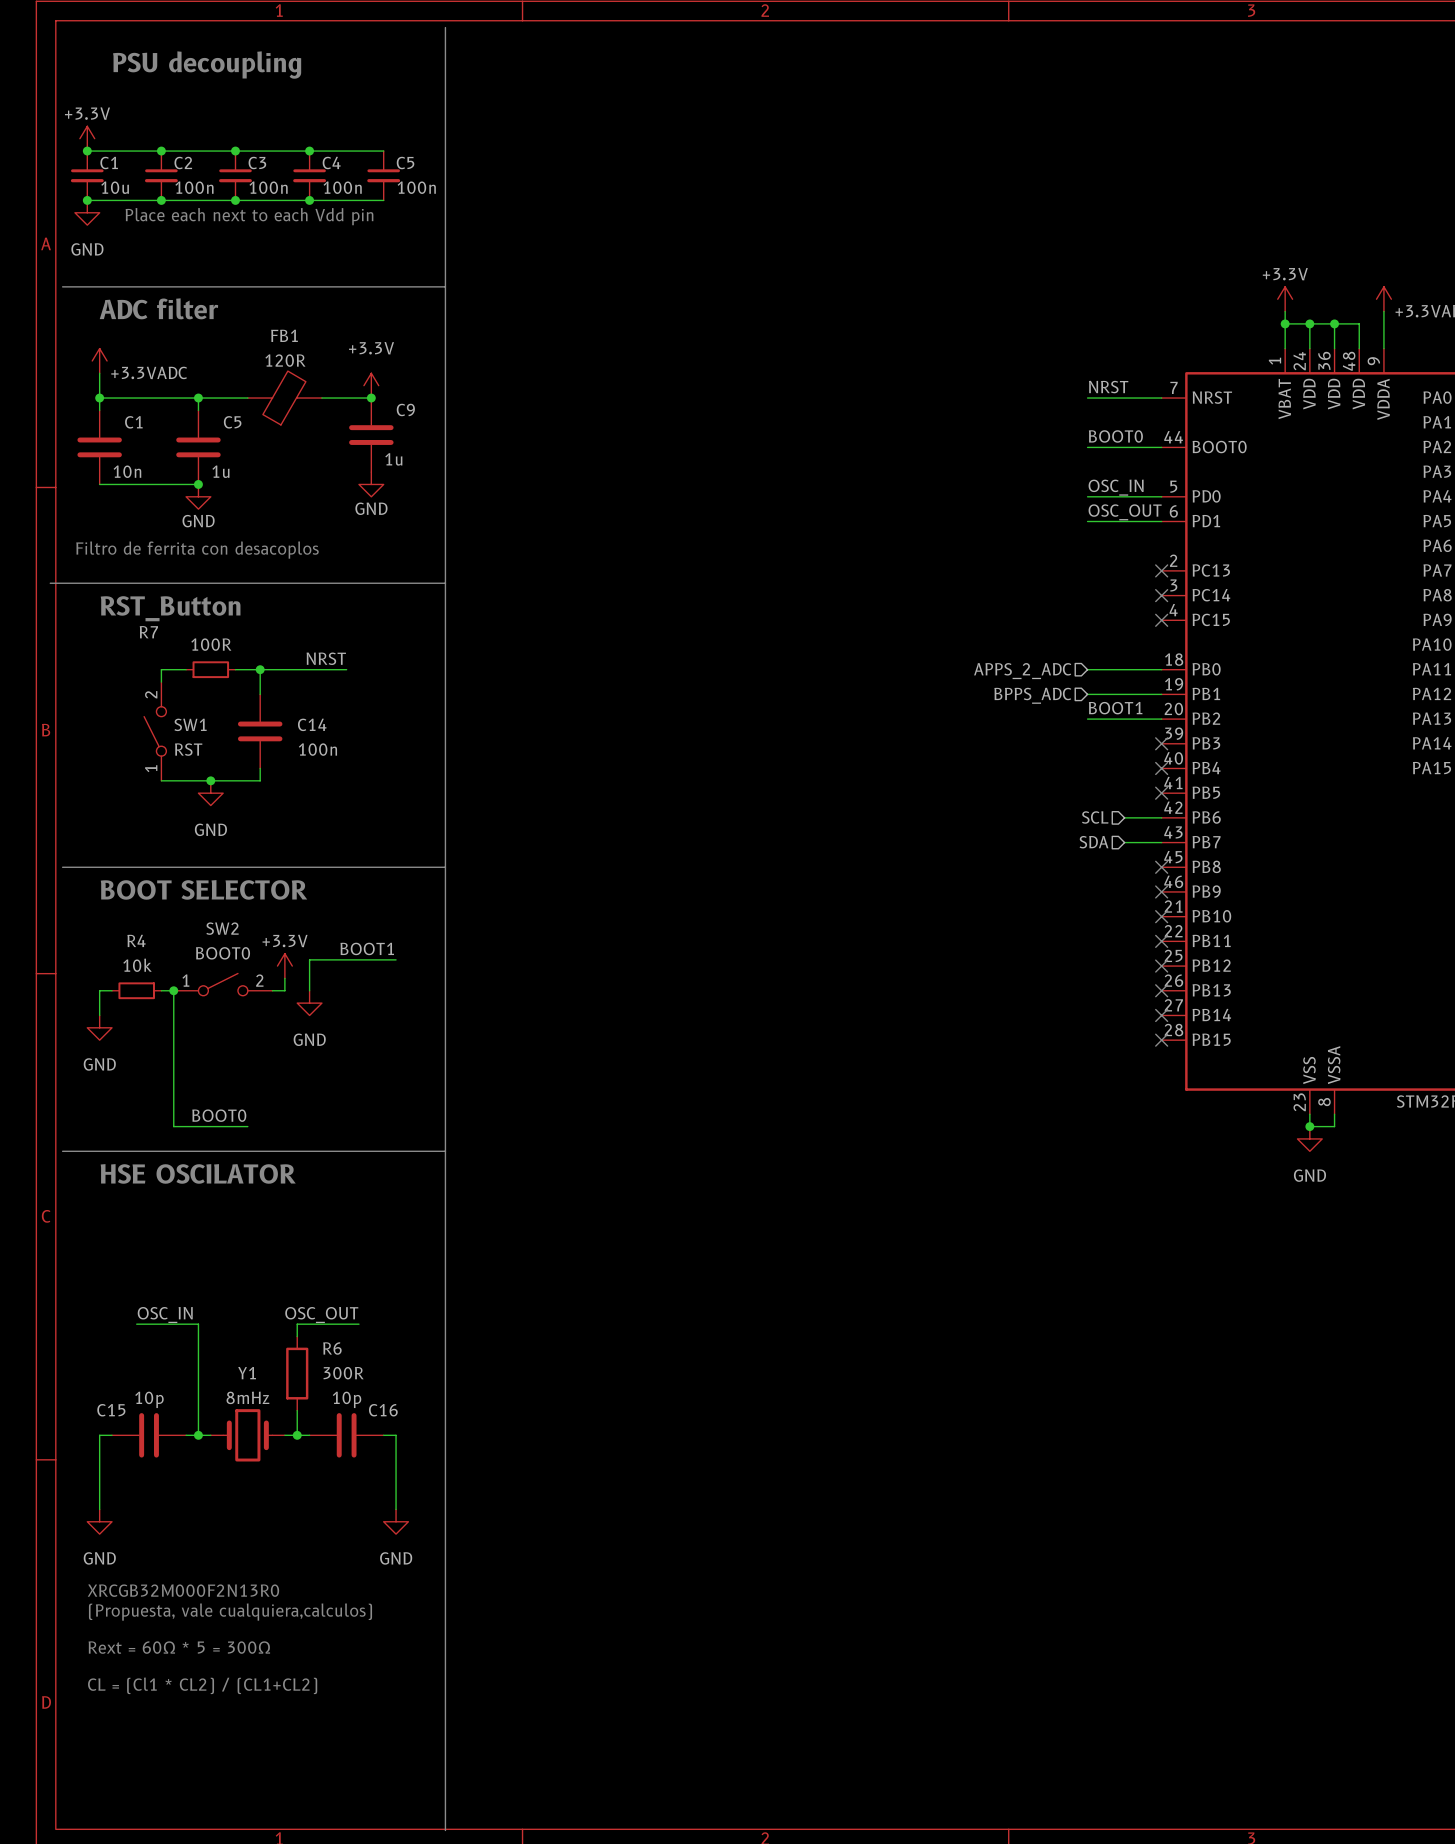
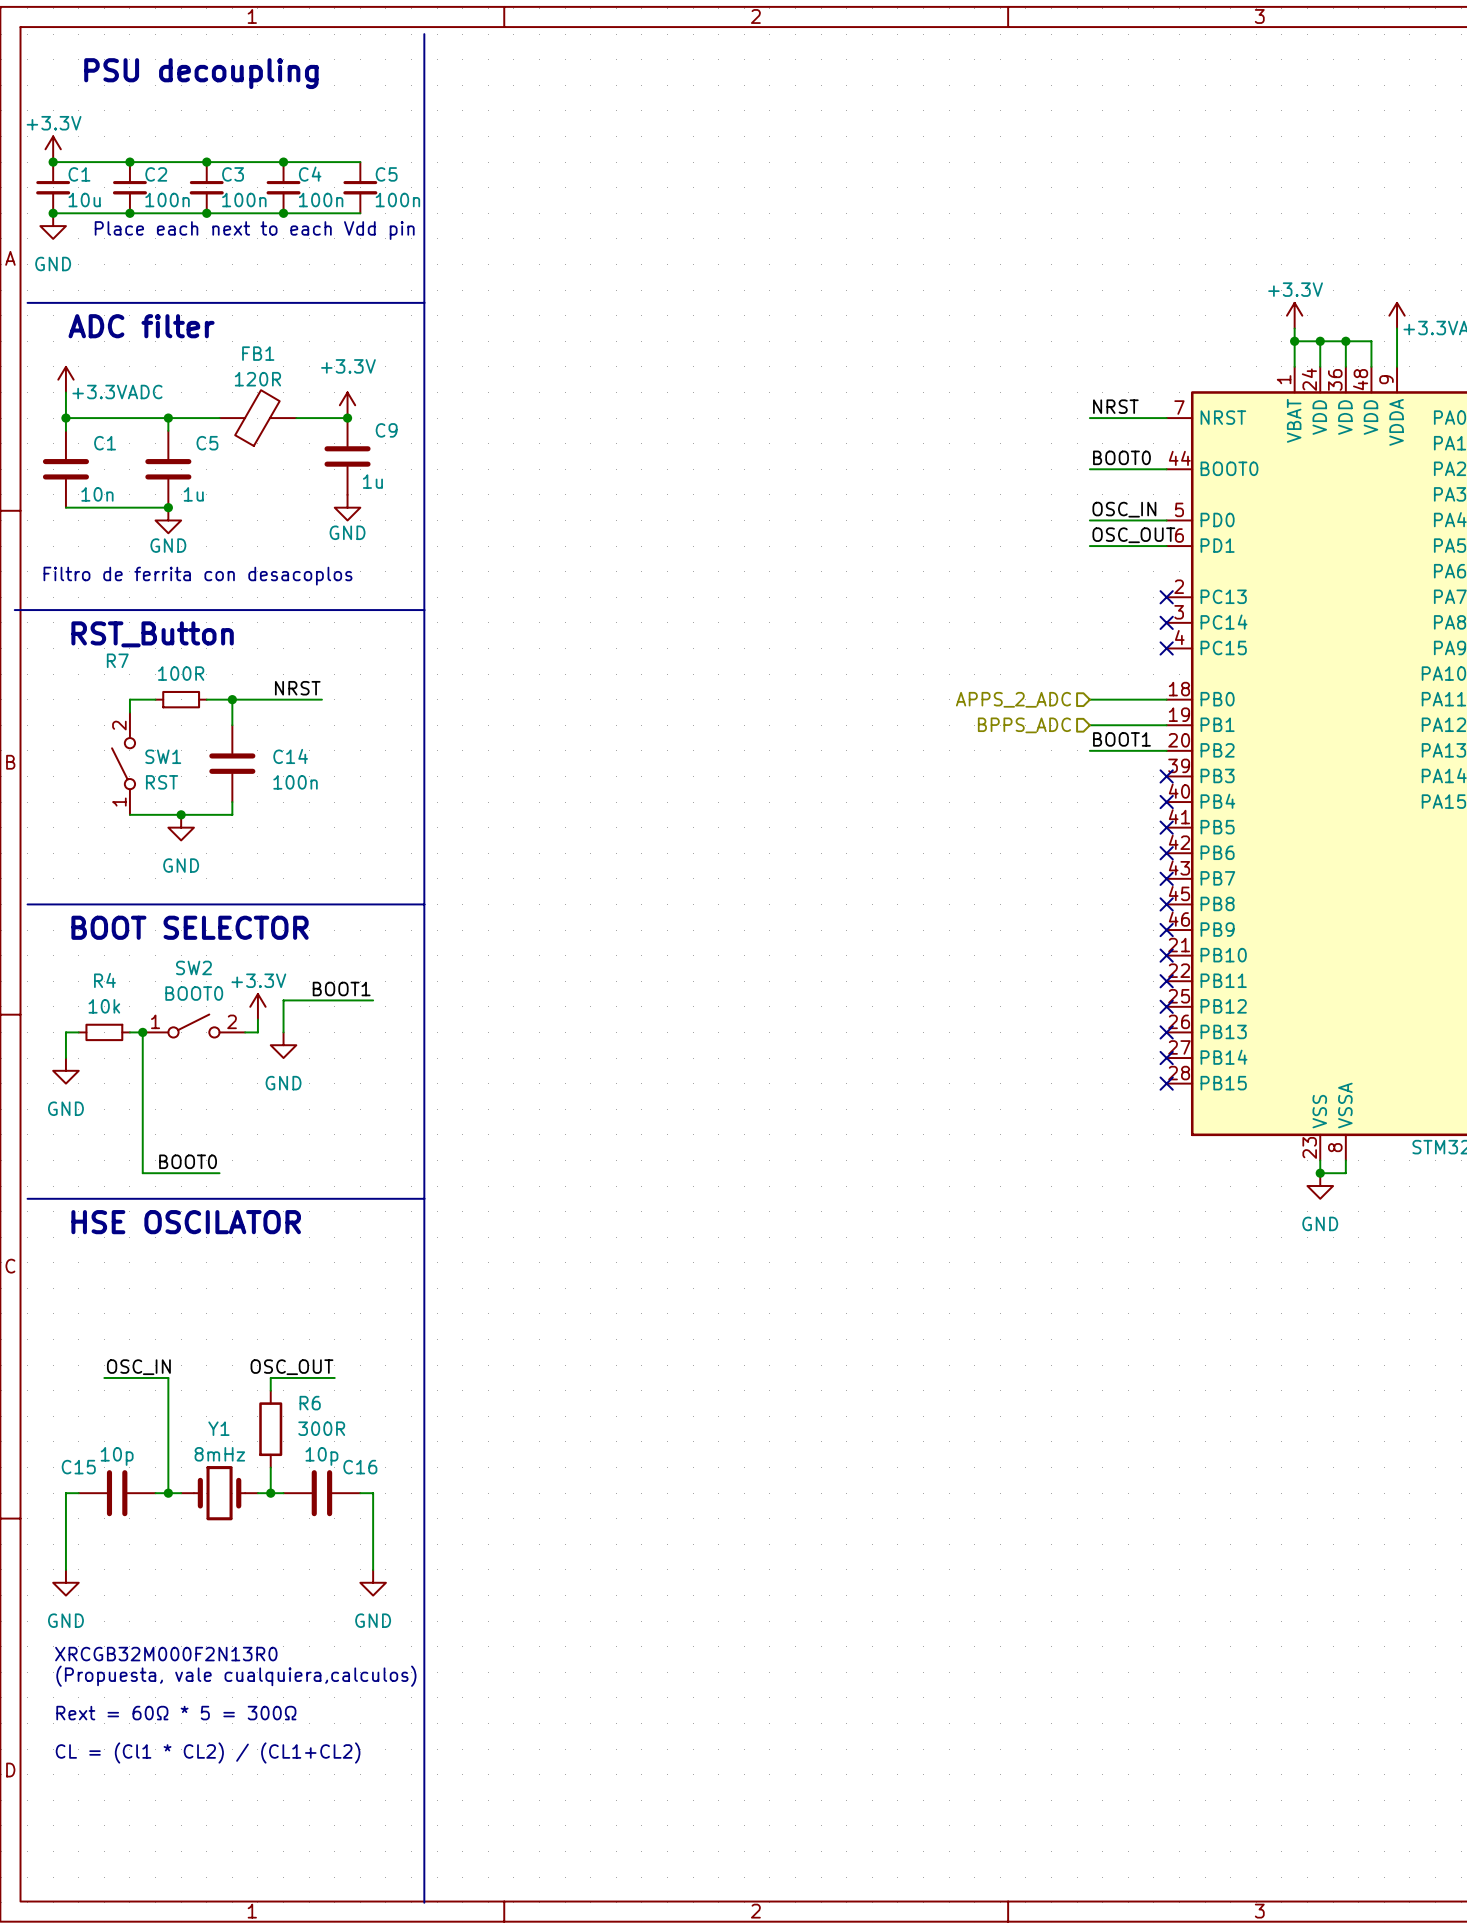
hierarchical label: SCL (1095, 817) -> none
wire: (1124, 817) (1161, 817) -> none
no-connect mark: none -> (1166, 853)
hierarchical label: SDA (1093, 842) -> none
wire: (1124, 842) (1161, 842) -> none
no-connect mark: none -> (1166, 878)

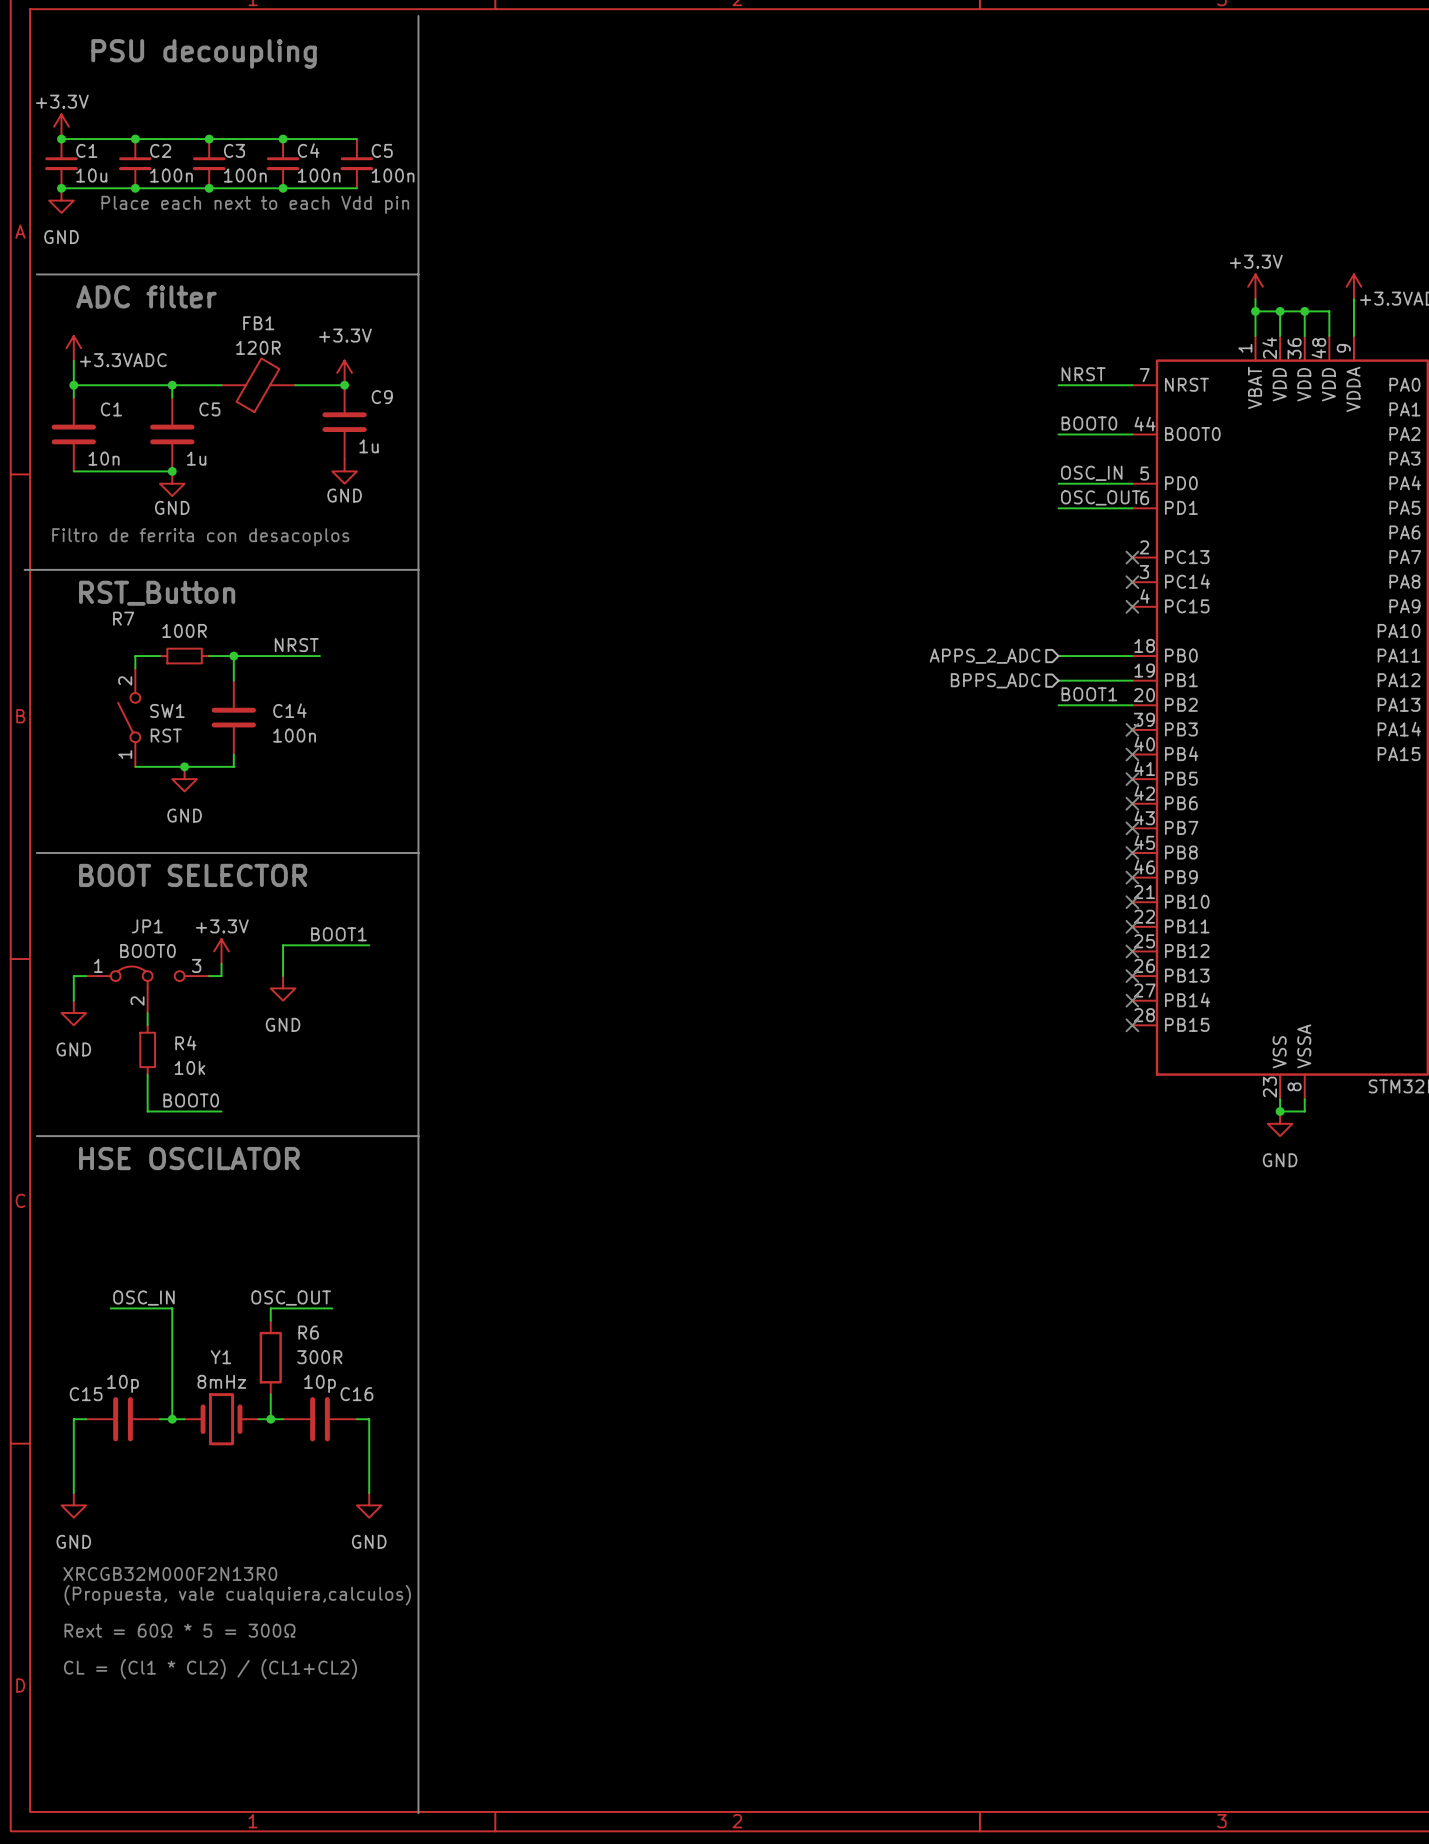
R4 value position: 10k (104, 1006) -> 10k (189, 1067)
power symbol position: +3.3V (257, 1006) -> +3.3V (221, 951)
wire: (257, 1019) (257, 1032) (245, 1032) -> (221, 963) (221, 976) (209, 976)
SW2: BOOT0 (193, 1026) -> none
R4 rotation: 0° (104, 1032) -> 90° clockwise (147, 1049)
R4 position: (104, 1032) -> (147, 1049)
junction: (142, 1032) -> none
JP1: none -> BOOT0 (147, 989)
wire: (142, 1083) (142, 1134) -> none

